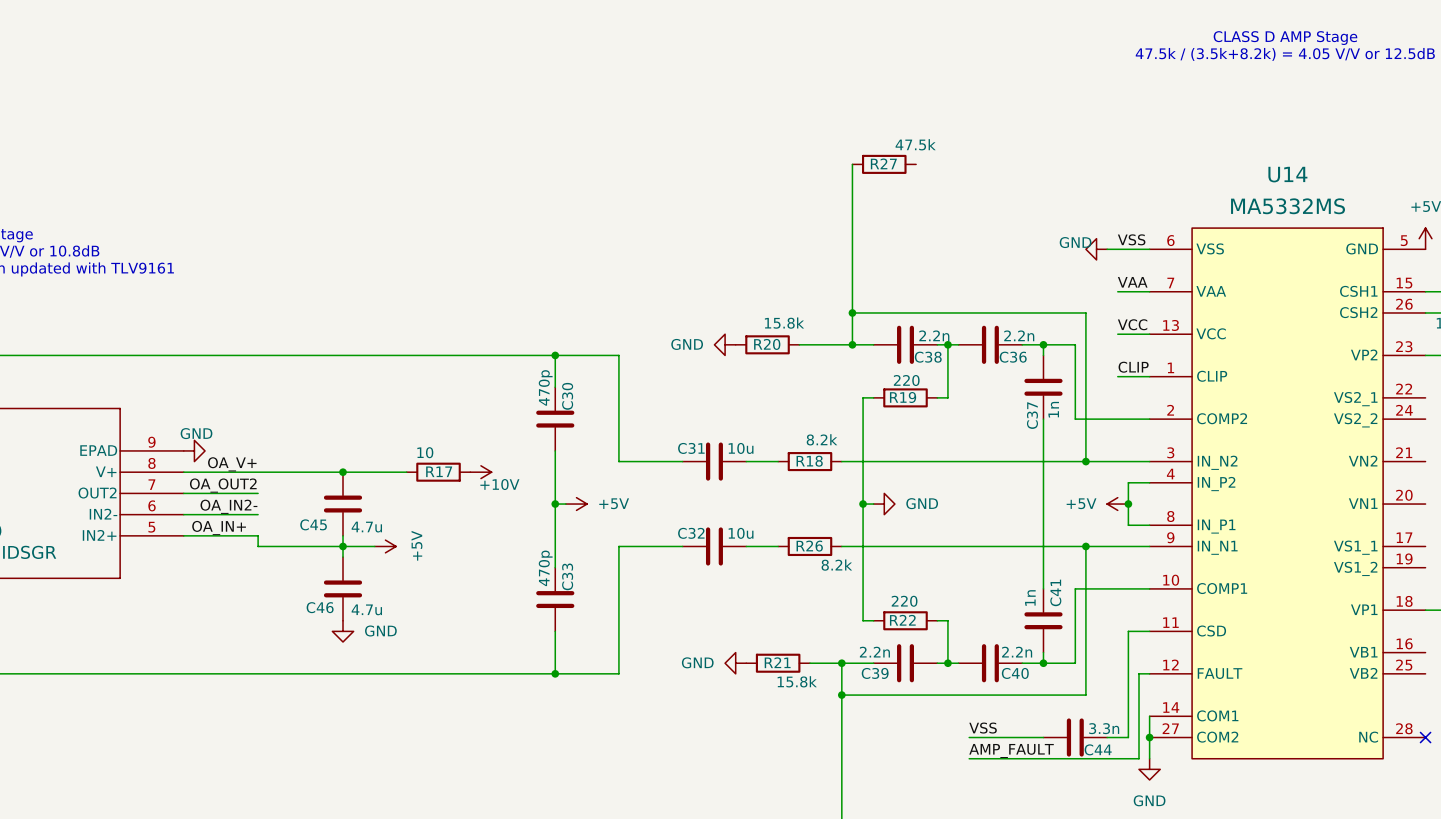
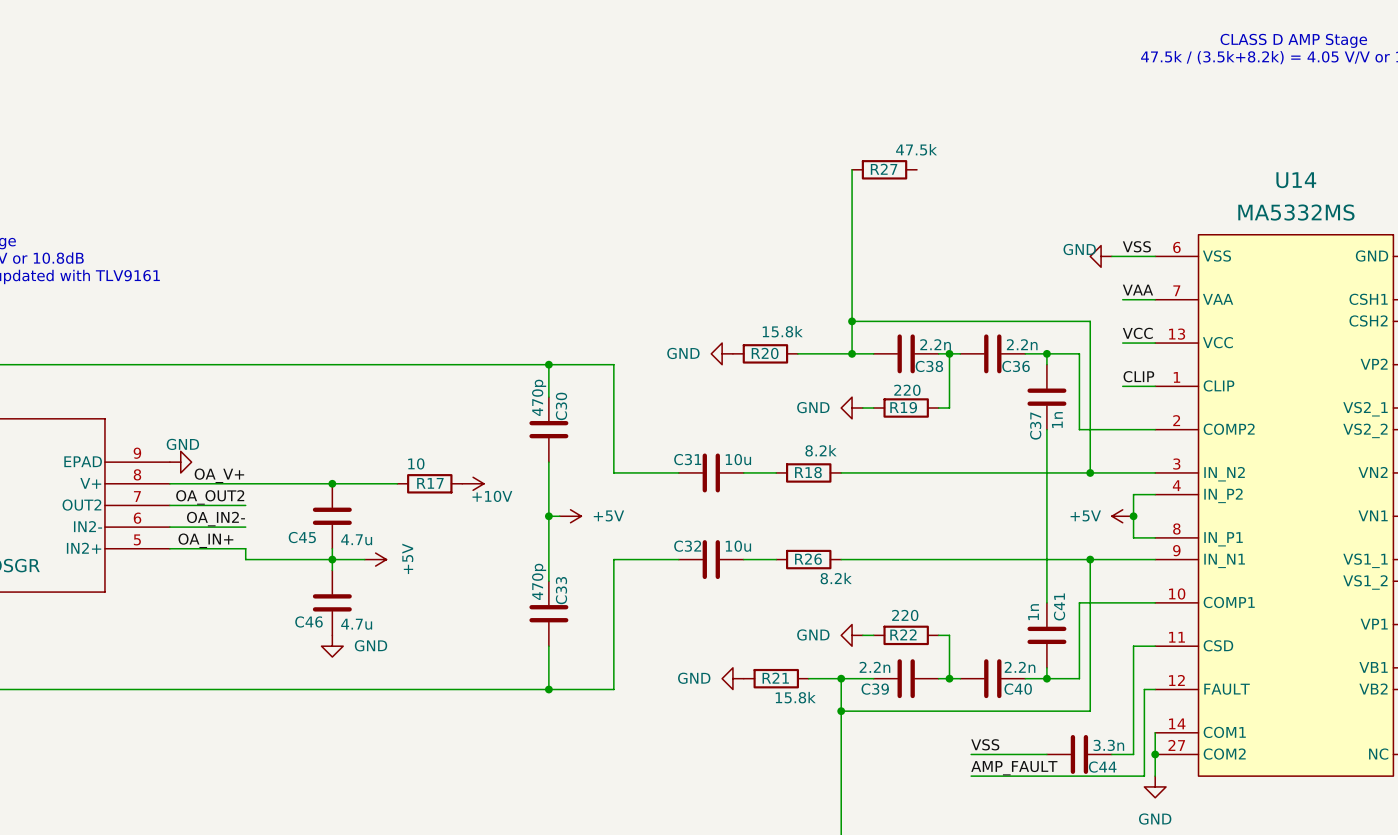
power symbol: none -> GND (852, 408)
wire: (863, 397) (863, 620) -> none
wire: (863, 504) (873, 504) -> none
junction: (863, 504) -> none
power symbol: GND (884, 504) -> none
power symbol: none -> GND (852, 635)

